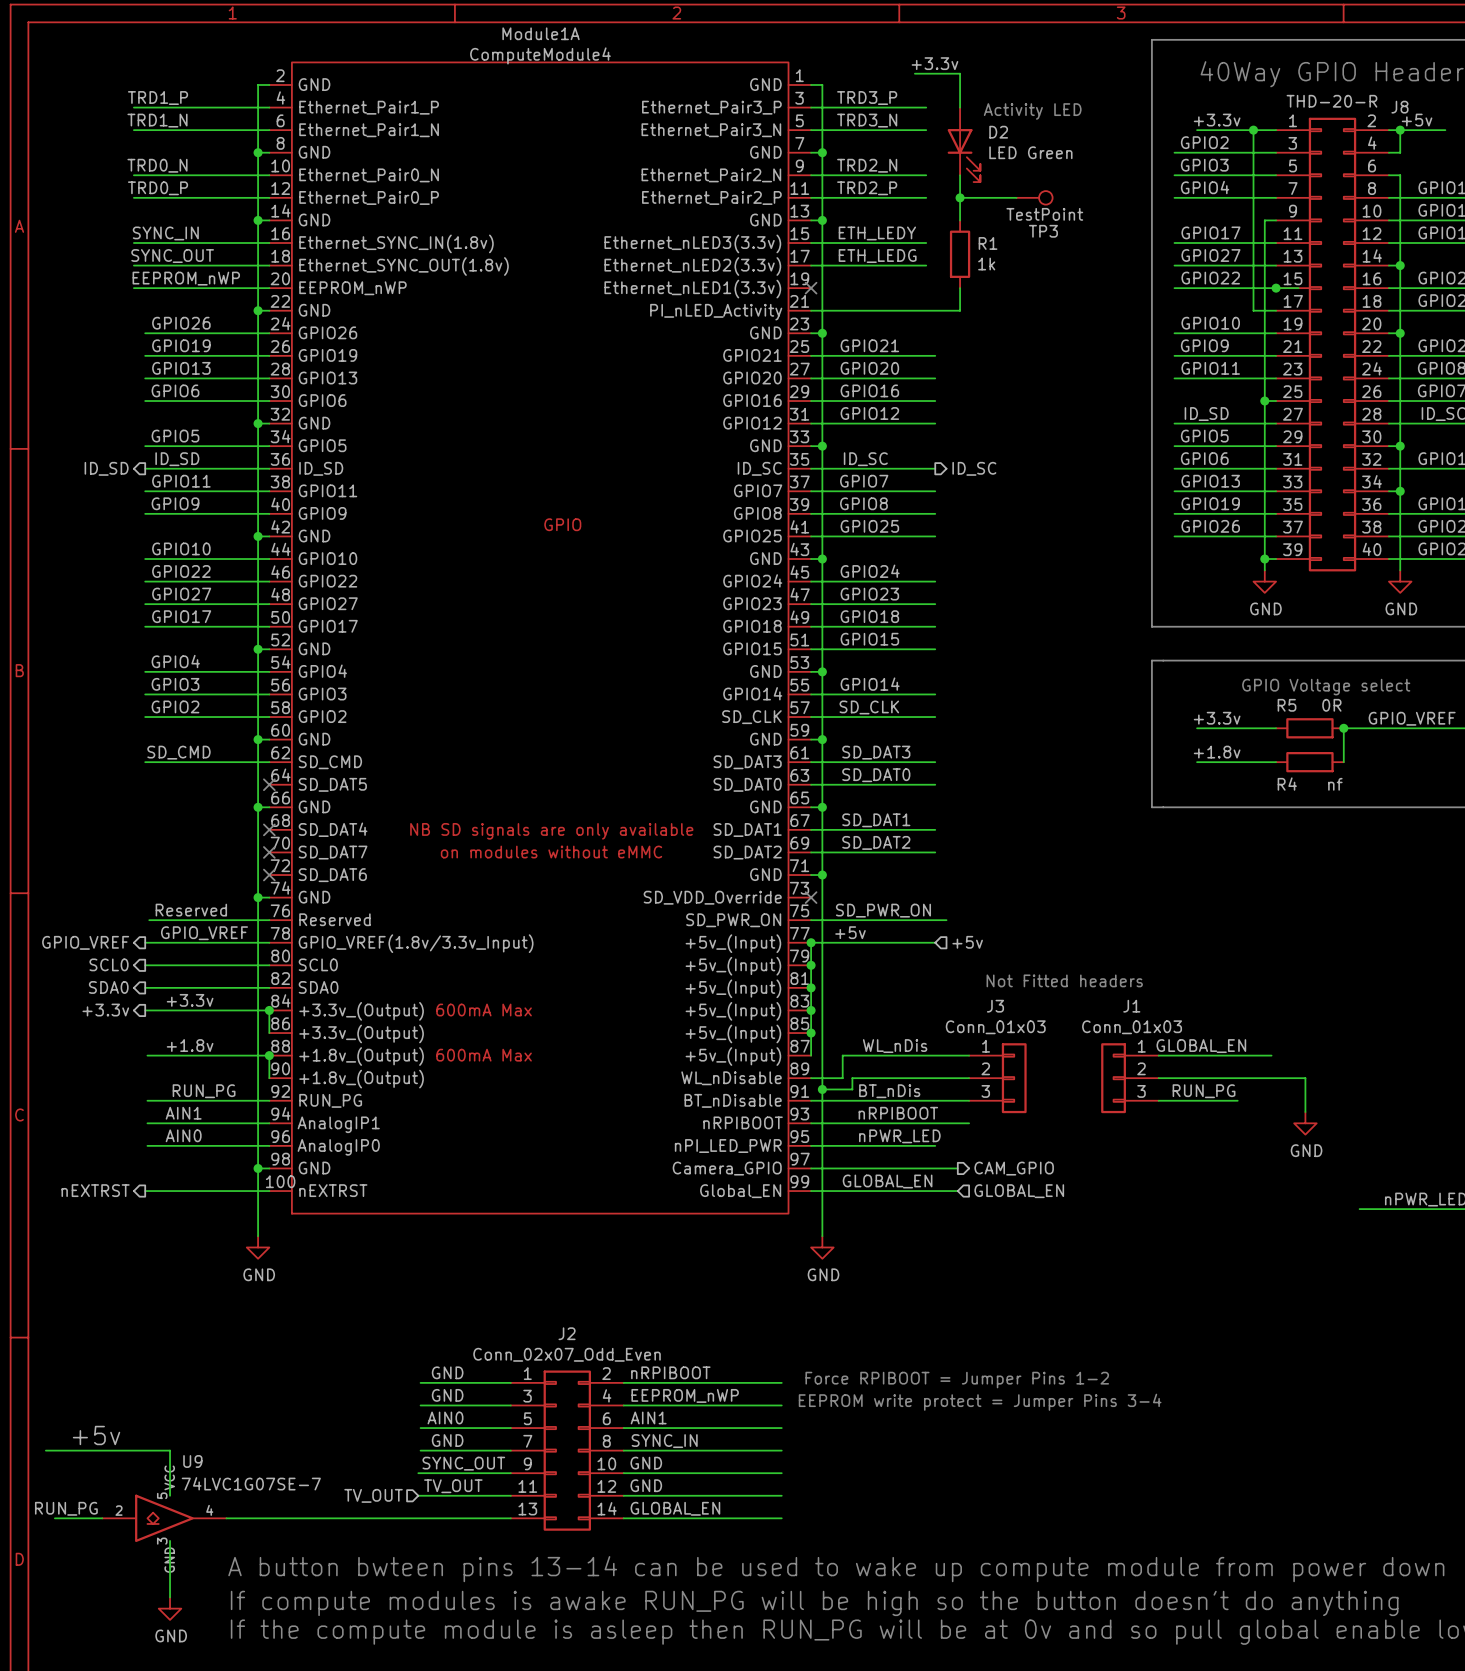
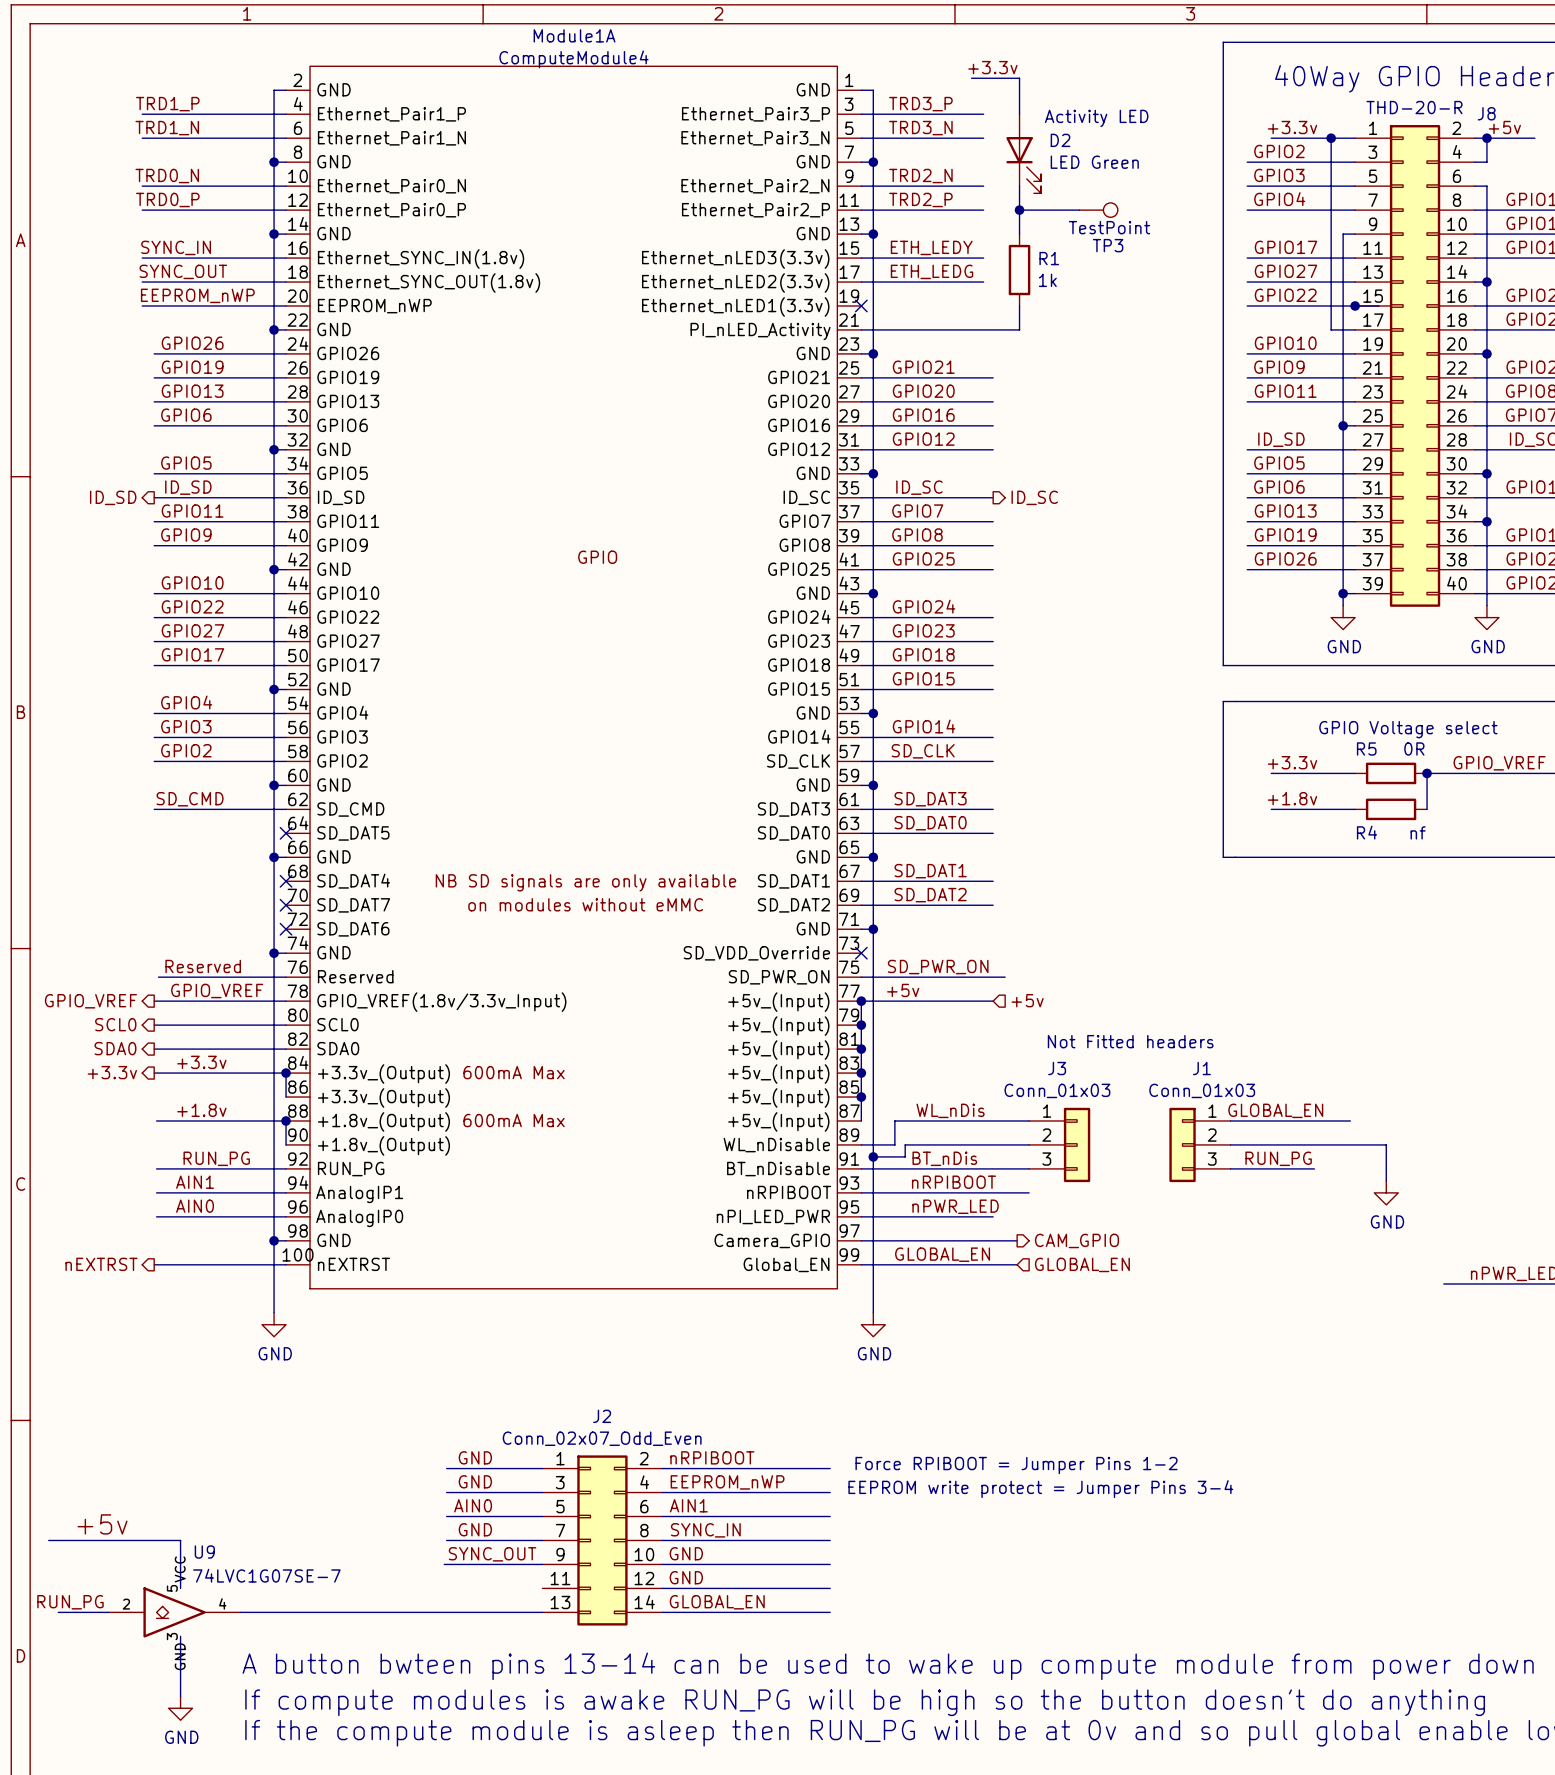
label: TV_OUT (453, 1486) -> none
hierarchical label: TV_OUT (373, 1495) -> none
wire: (418, 1495) (510, 1495) -> none

